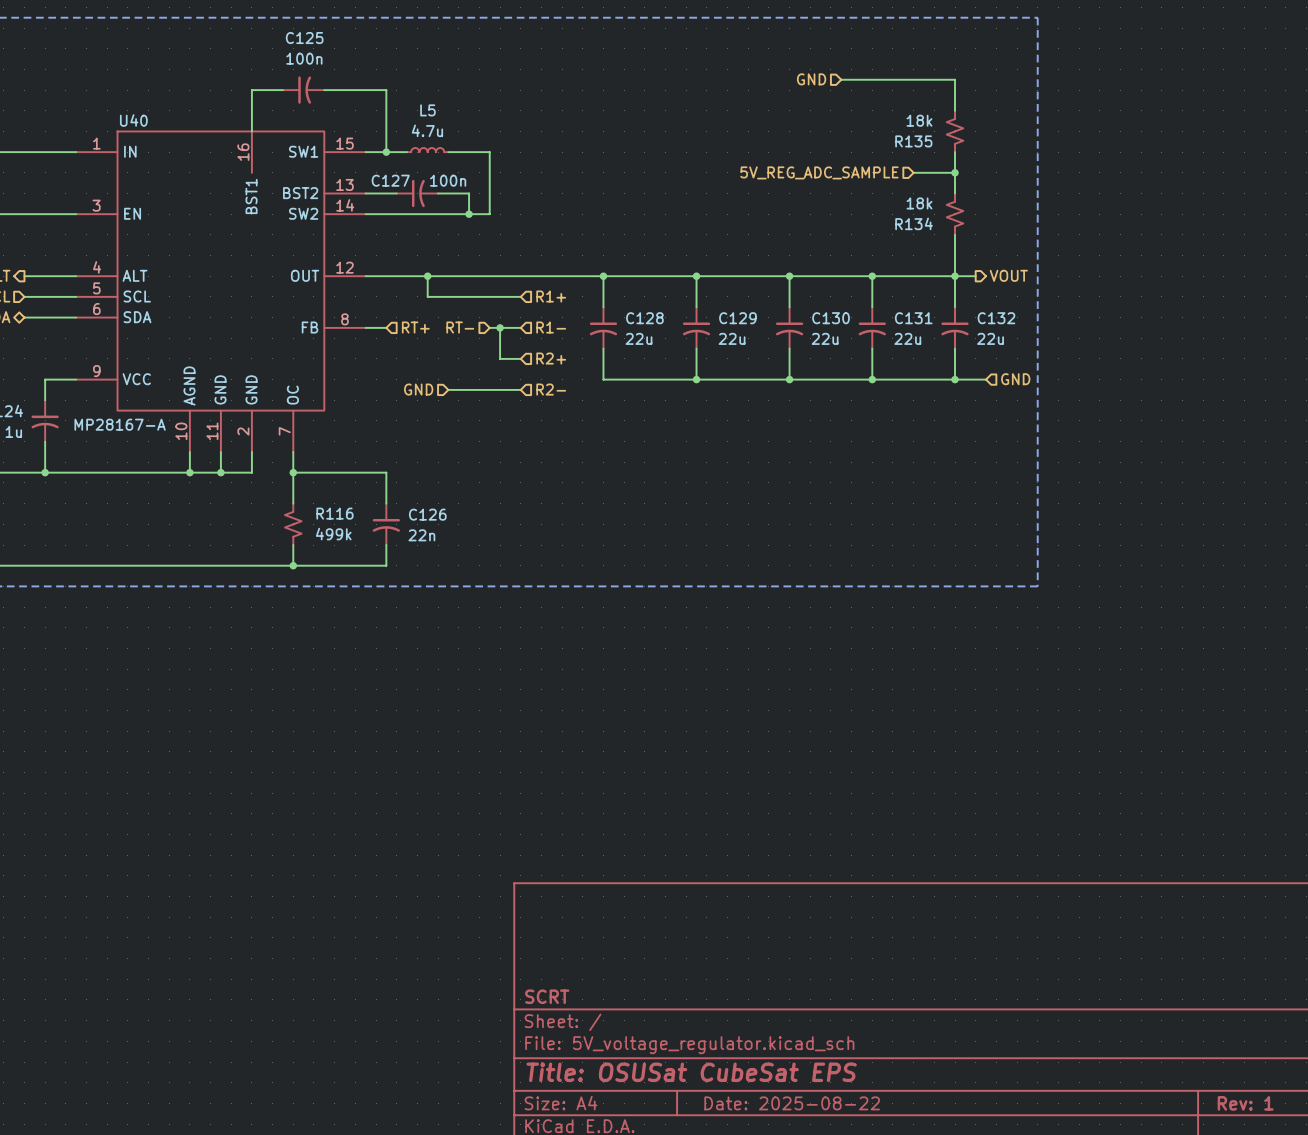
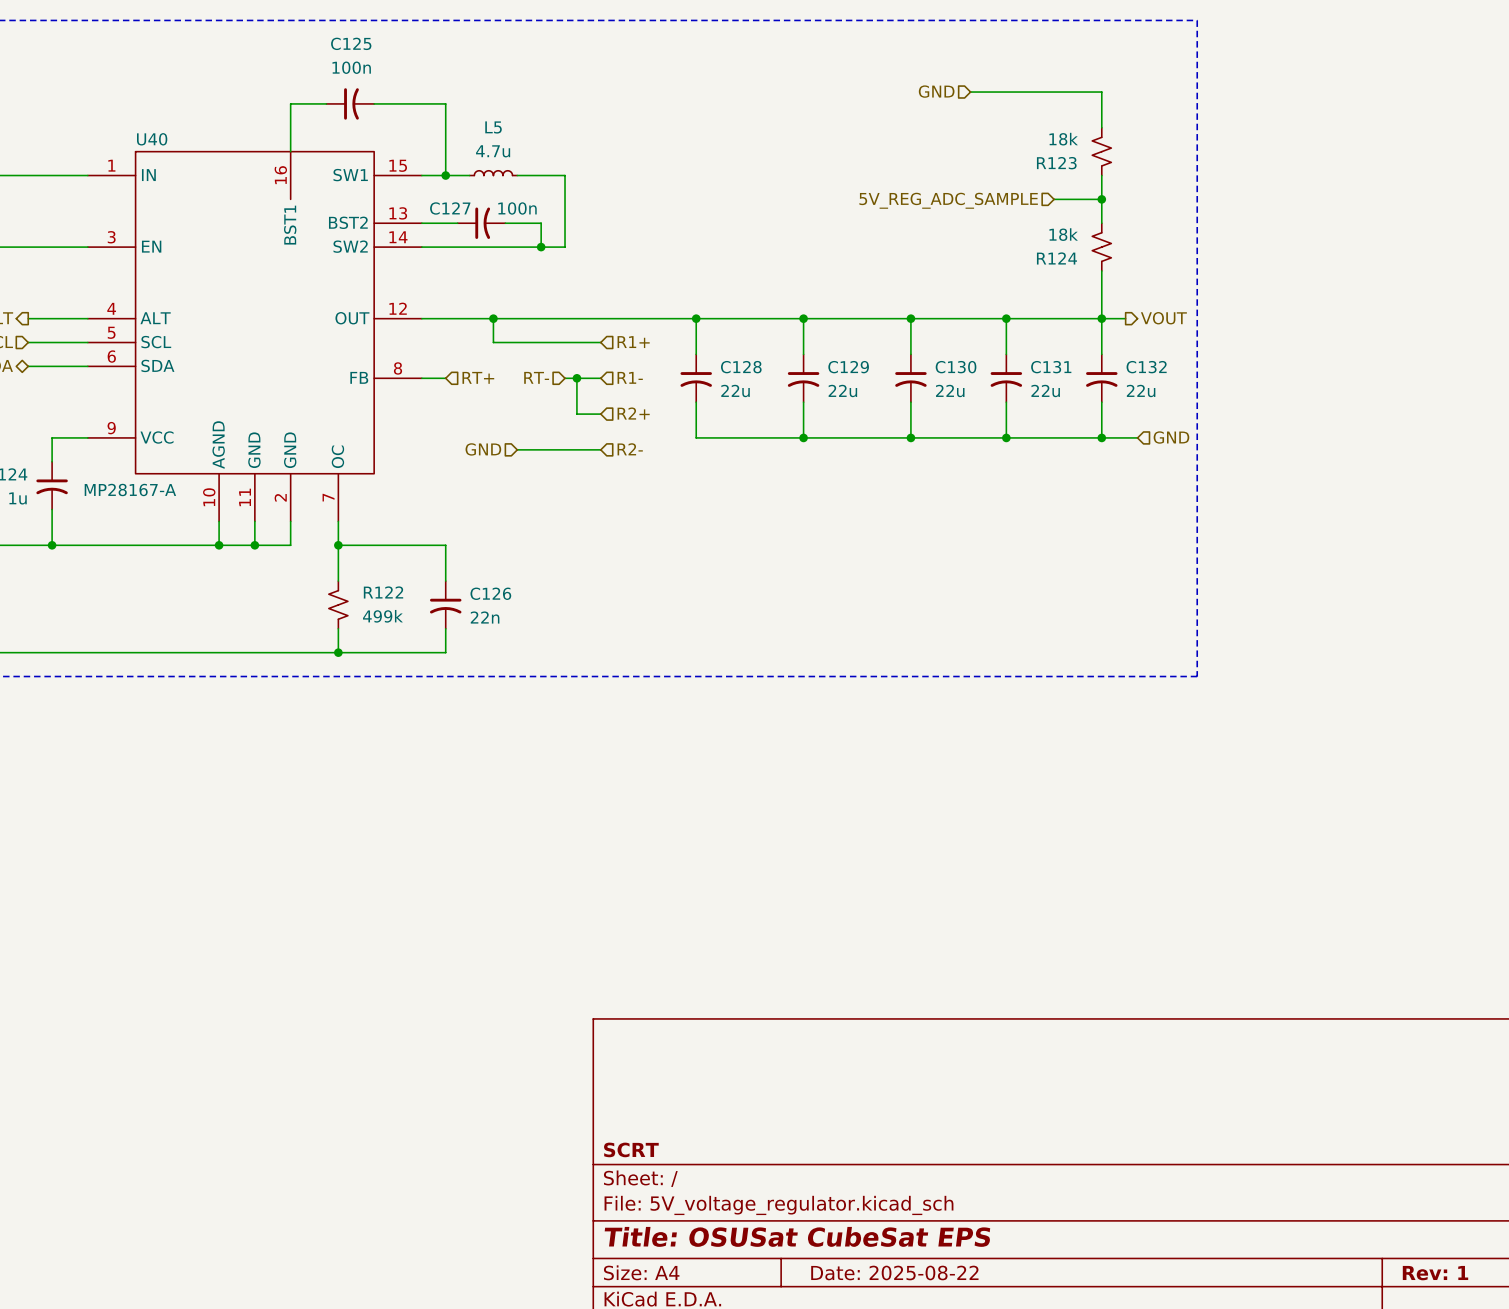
R135 name: R135 (913, 141) -> R123 (1056, 163)
R134 name: R134 (914, 223) -> R124 (1056, 258)
R116 name: R116 (334, 513) -> R122 (383, 592)

